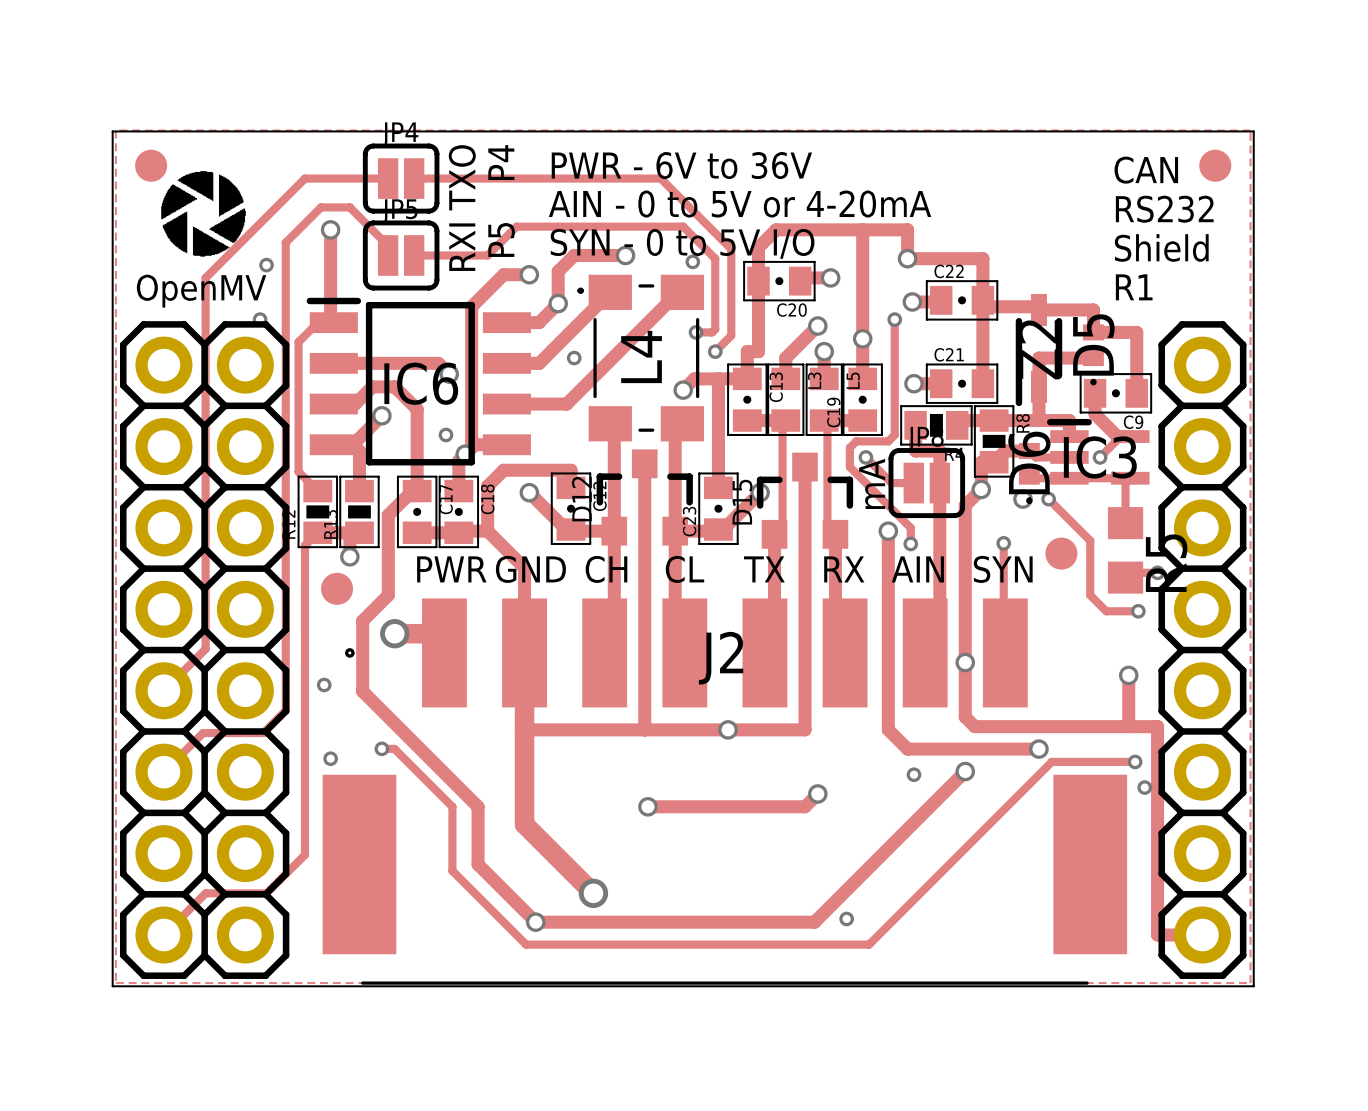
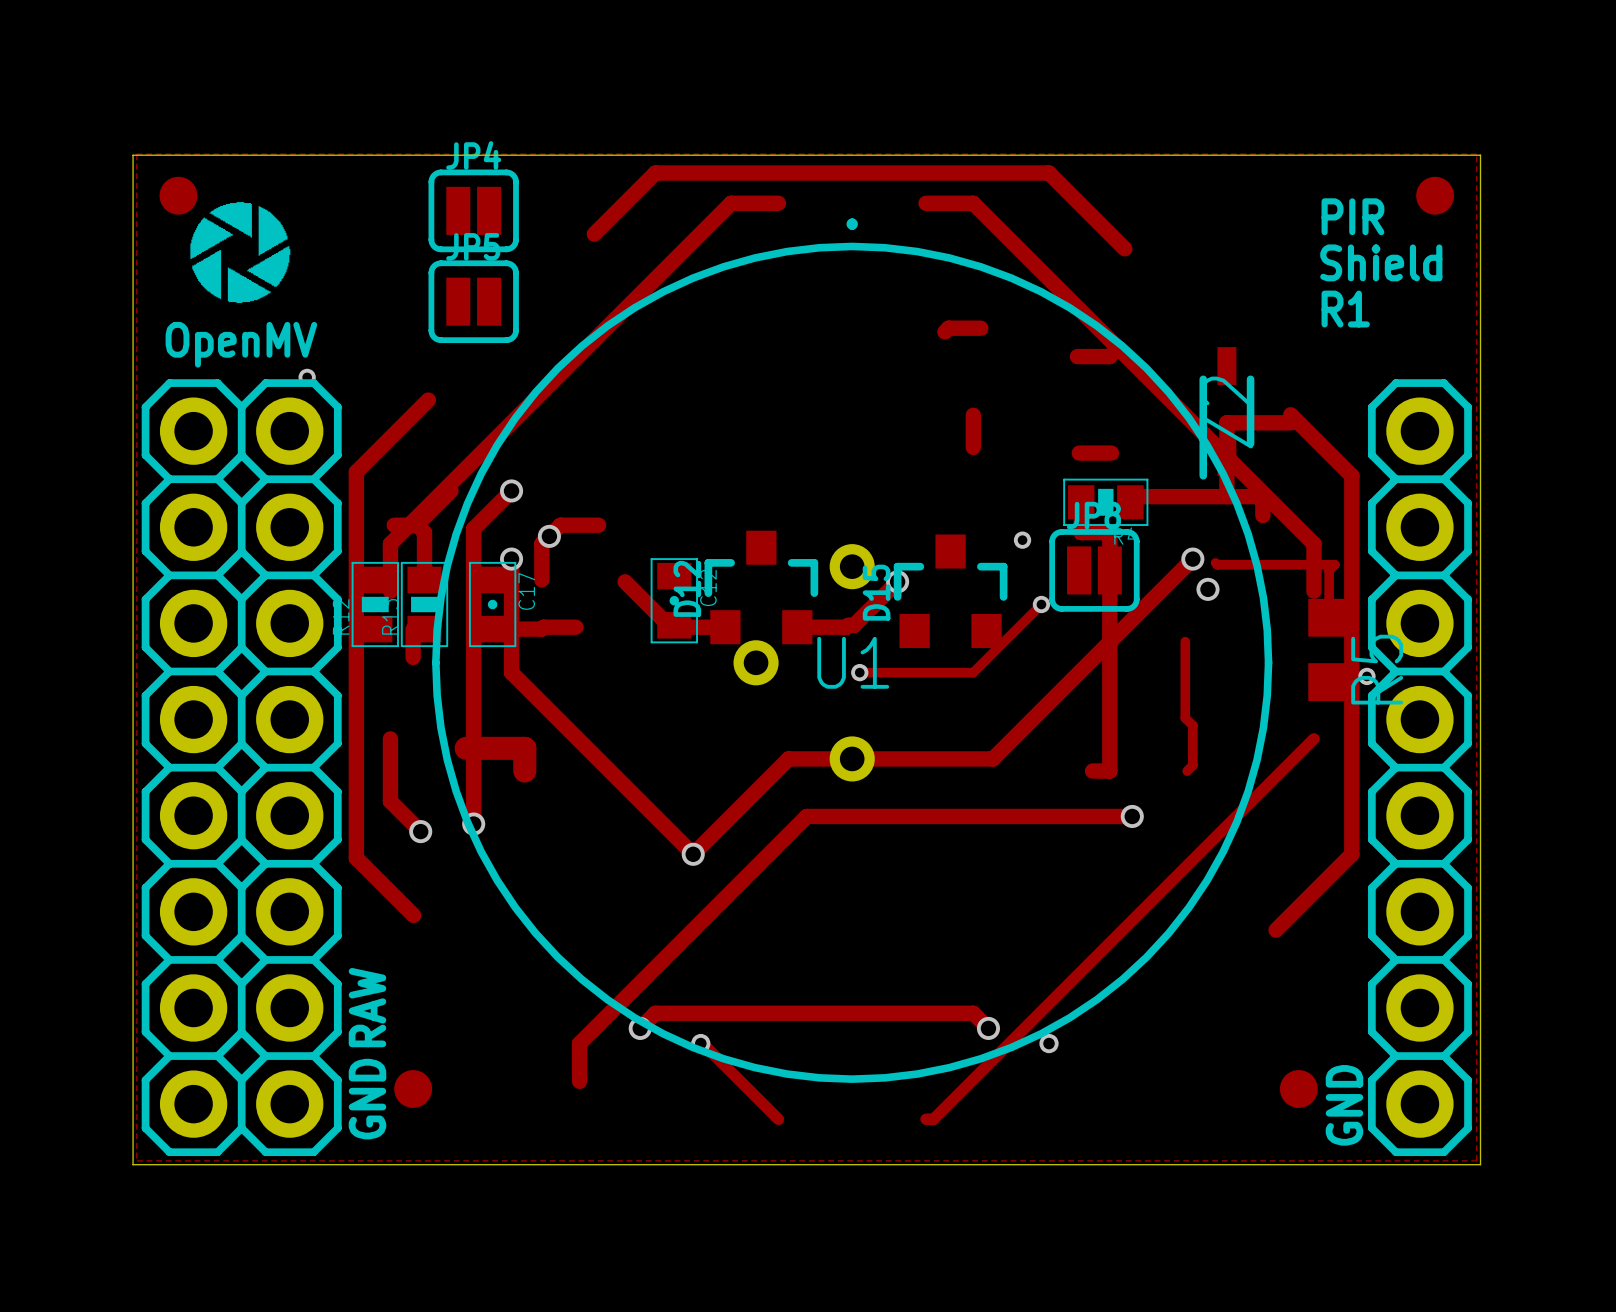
text: P4 (501, 162) -> none
text: PWR - 6V to 36V (681, 165) -> none
text: CAN (1146, 170) -> none
track: none -> (778, 203) (731, 203) (390, 543) (390, 591)
track: none -> (926, 203) (973, 203) (1313, 543) (1313, 591)
text: TXO (462, 177) -> none
track: (388, 178) (304, 178) (205, 277) (205, 649) (163, 690) -> none
track: (414, 178) (660, 178) (731, 249) (731, 335) (715, 351) -> none
text: none -> PIR (1352, 216)
track: none -> (594, 234) (655, 173) (1049, 173) (1124, 248)
text: AIN - 0 to 5V or 4-20mA (740, 204) -> none
text: RS232 (1164, 209) -> none
track: (330, 229) (330, 319) (333, 322) (317, 322) (298, 342) (298, 471) (317, 491) -> none
via: (330, 229) -> none
track: (862, 229) (862, 378) -> none
text: P5 (501, 239) -> none
text: SYN - 0 to 5V I/O (682, 243) -> none
text: RXI (462, 247) -> none
text position: Shield (1161, 247) -> Shield (1381, 262)
track: (388, 255) (388, 245) (349, 207) (321, 207) (285, 242) (285, 710) (263, 733) (203, 733) (163, 772) -> none
track: (414, 255) (487, 255) (516, 226) (683, 226) (715, 258) (715, 329) (712, 332) (696, 332) -> none
track: (625, 255) (574, 255) (558, 271) (558, 303) (539, 322) (506, 322) -> none
via: (625, 255) -> none
via: (907, 258) -> none
via: (692, 261) -> none
via: (266, 265) -> none
track: (529, 274) (503, 274) (471, 306) (471, 447) -> none
via: (529, 274) -> none
via: (830, 277) -> none
C20: (779, 281) -> none
text position: R1 (1134, 287) -> R1 (1345, 309)
track: (610, 292) (539, 363) (506, 363) -> none
track: (682, 292) (678, 292) (566, 404) (506, 404) -> none
C22: (962, 300) -> none
via: (912, 301) -> none
via: (558, 303) -> none
track: (982, 306) (1038, 306) (1038, 309) (1093, 309) (1093, 332) (1136, 332) (1136, 393) -> none
track: (894, 319) (894, 434) (888, 441) (856, 441) (849, 447) (849, 467) (910, 527) (910, 543) -> none
via: (894, 319) -> none
track: (817, 326) (785, 358) (785, 378) -> none
via: (817, 326) -> none
via: (696, 332) -> none
track: none -> (428, 400) (356, 472) (356, 858) (413, 915)
via: (862, 338) -> none
via: (715, 351) -> none
via: (824, 351) -> none
track: none -> (1290, 414) (1351, 475) (1351, 854) (1276, 930)
D5: (1093, 354) -> none
via: (574, 358) -> none
L4: (640, 358) -> none
track: (333, 363) (438, 363) (449, 374) -> none
via: (449, 374) -> none
track: (718, 378) (718, 487) -> none
IC6: (418, 381) -> none
via: (913, 383) -> none
C21: (962, 383) -> none
track: (982, 383) (982, 258) (907, 258) (907, 229) (776, 229) (758, 247) (758, 351) (747, 351) (747, 378) (694, 378) (683, 390) -> none
via: (683, 390) -> none
track: (1095, 393) (1095, 414) (1117, 436) (1130, 436) (1120, 436) (1099, 457) -> none
C9: (1115, 393) -> none
C13: (747, 399) -> none
L3: (785, 399) -> none
L5: (824, 399) -> none
C19: (862, 399) -> none
track: (333, 404) (355, 404) (372, 386) (394, 386) (417, 409) (417, 491) (412, 491) (388, 515) (388, 595) (362, 620) (362, 691) (478, 806) (478, 864) (535, 922) (814, 922) (965, 771) -> none
via: (381, 415) -> none
track: none -> (511, 490) (473, 528) (473, 824)
via: none -> (511, 490)
track: (747, 420) (785, 420) (782, 423) (782, 526) (774, 534) (774, 643) (764, 652) -> none
track: (862, 420) (824, 420) (827, 423) (827, 526) (835, 534) (835, 619) (845, 628) (845, 652) -> none
track: (610, 423) (614, 427) (614, 625) (604, 635) (604, 652) -> none
track: (682, 423) (675, 430) (675, 643) (684, 652) -> none
via: (446, 434) -> none
R8: (994, 441) -> none
IC3: (1098, 451) -> none
track: (865, 457) (891, 483) (913, 483) -> none
track: (1069, 457) (1035, 457) (1029, 451) (1005, 451) (994, 462) (981, 462) (981, 489) (965, 505) (965, 717) (974, 726) (1157, 726) (1157, 935) (1202, 935) -> none
via: (1100, 457) -> none
track: (644, 463) (644, 729) -> none
track: (805, 467) (805, 729) (524, 729) -> none
track: none -> (511, 559) (511, 672) (693, 854) (788, 758) (993, 758) (1192, 559)
via: none -> (511, 559)
D6: (1029, 473) -> none
text: mA (872, 483) -> none
track: (571, 487) (571, 470) (503, 470) (487, 486) (487, 531) (524, 568) (524, 824) (593, 893) -> none
via position: (981, 489) -> (1192, 559)
via: (529, 492) -> none
track: (1048, 499) (1090, 540) (1090, 595) (1106, 611) (1138, 611) -> none
via: (1048, 499) -> none
C23: (718, 508) -> none
C18: (458, 511) -> none
track: none -> (1041, 604) (973, 672) (859, 672)
track: (888, 531) (888, 729) (907, 749) (1038, 749) -> none
via: (888, 531) -> none
track: (359, 532) (317, 532) (304, 545) (304, 854) (266, 893) (205, 893) (163, 935) -> none
via position: (910, 543) -> (1041, 604)
via: (1003, 543) -> none
U1: none -> (852, 650)
part position: (1061, 553) -> (1298, 1088)
via: (349, 556) -> none
text: PWR (451, 569) -> none
text: GND (530, 569) -> none
text: CH (606, 569) -> none
text: CL (684, 569) -> none
via: none -> (859, 672)
text: TX (764, 569) -> none
text: RX (844, 569) -> none
text: AIN (917, 569) -> none
text: SYN (1003, 569) -> none
part position: (337, 588) -> (413, 1088)
via: (1138, 611) -> none
track: none -> (390, 738) (390, 801) (420, 831)
track: none -> (1313, 738) (933, 1119) (926, 1119)
via: (394, 633) -> none
via position: (965, 662) -> (1132, 816)
track: (1128, 675) (1128, 726) -> none
via: (1128, 675) -> none
via: (324, 684) -> none
track: none -> (1132, 816) (806, 816) (579, 1043) (579, 1081)
via: none -> (473, 824)
via: none -> (420, 831)
via: none -> (693, 854)
via: (728, 729) -> none
track: (381, 748) (394, 748) (452, 806) (452, 870) (526, 944) (869, 944) (1051, 761) (1135, 761) -> none
via: (381, 748) -> none
via: (1038, 749) -> none
via: (330, 758) -> none
via: (1135, 761) -> none
via: (965, 771) -> none
via: (913, 774) -> none
via: (1144, 787) -> none
J2: (724, 791) -> none
track: (817, 793) (805, 806) (647, 806) -> none
via position: (817, 793) -> (988, 1028)
via: (647, 806) -> none
text: none -> RAW (367, 1007)
track: none -> (640, 1028) (655, 1013) (973, 1013) (988, 1028)
via size: [578, 878, 609, 908] -> [691, 1033, 711, 1054]
track: none -> (700, 1043) (778, 1119)
via: none -> (1049, 1043)
via: (846, 918) -> none
via position: (535, 922) -> (640, 1028)
text: none -> GND (367, 1099)
text: none -> GND (1344, 1105)

